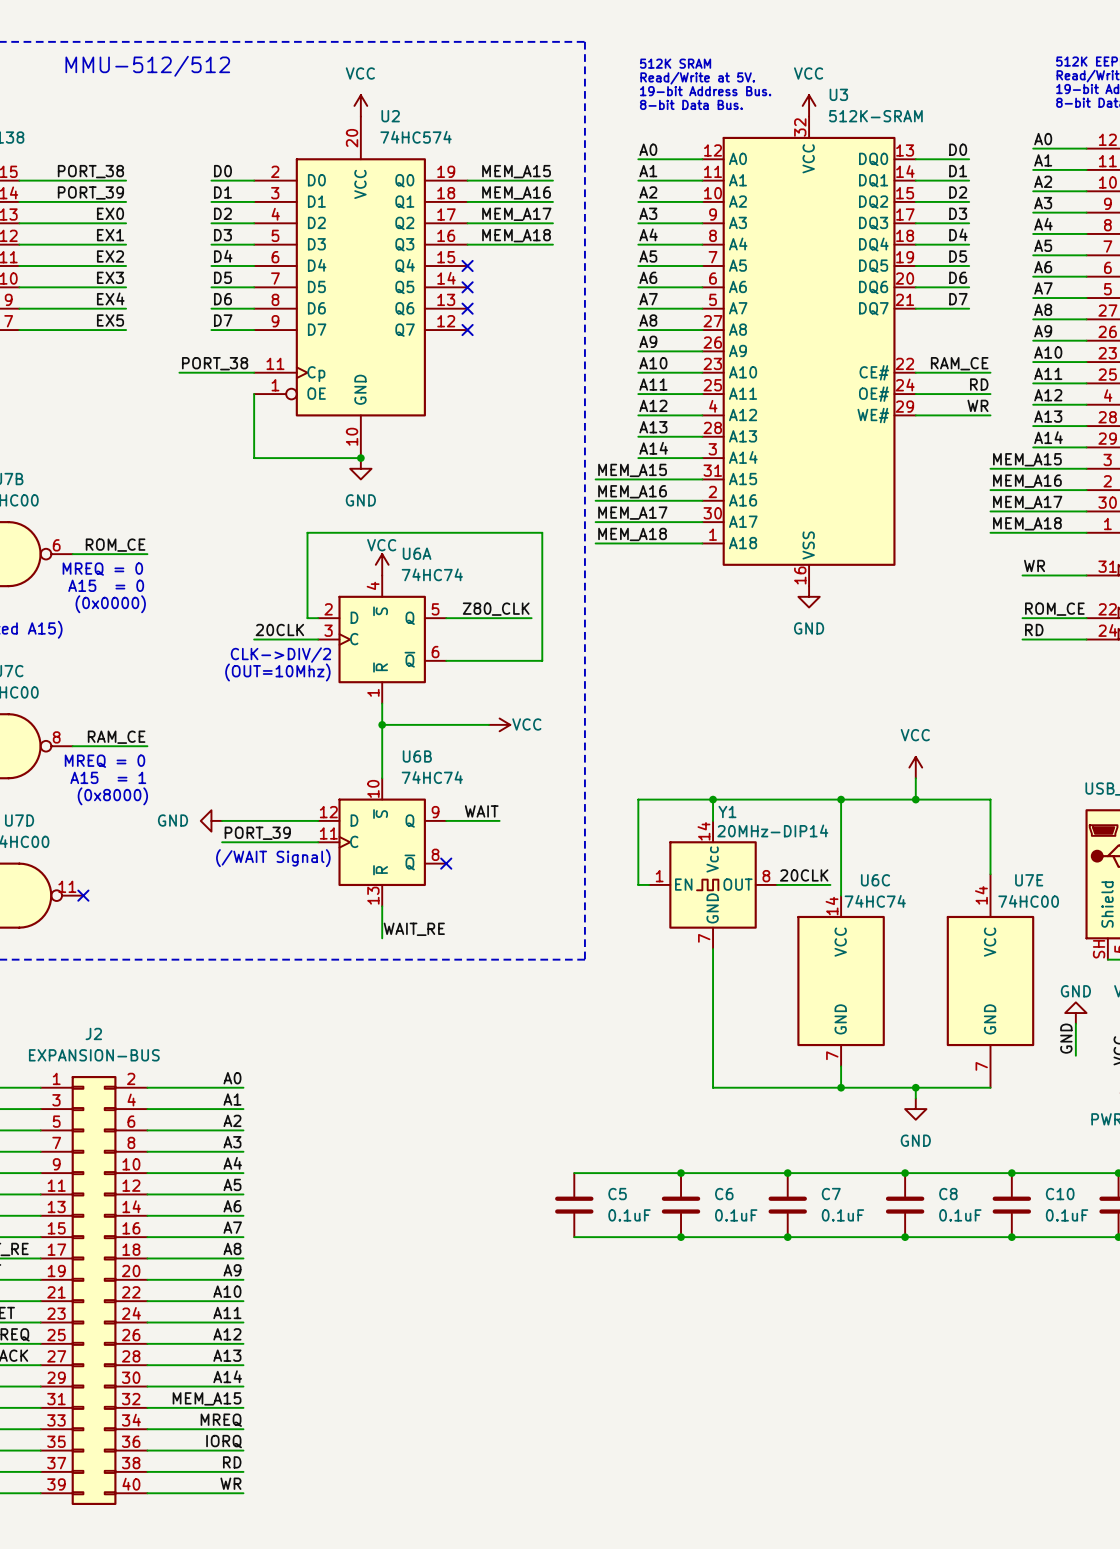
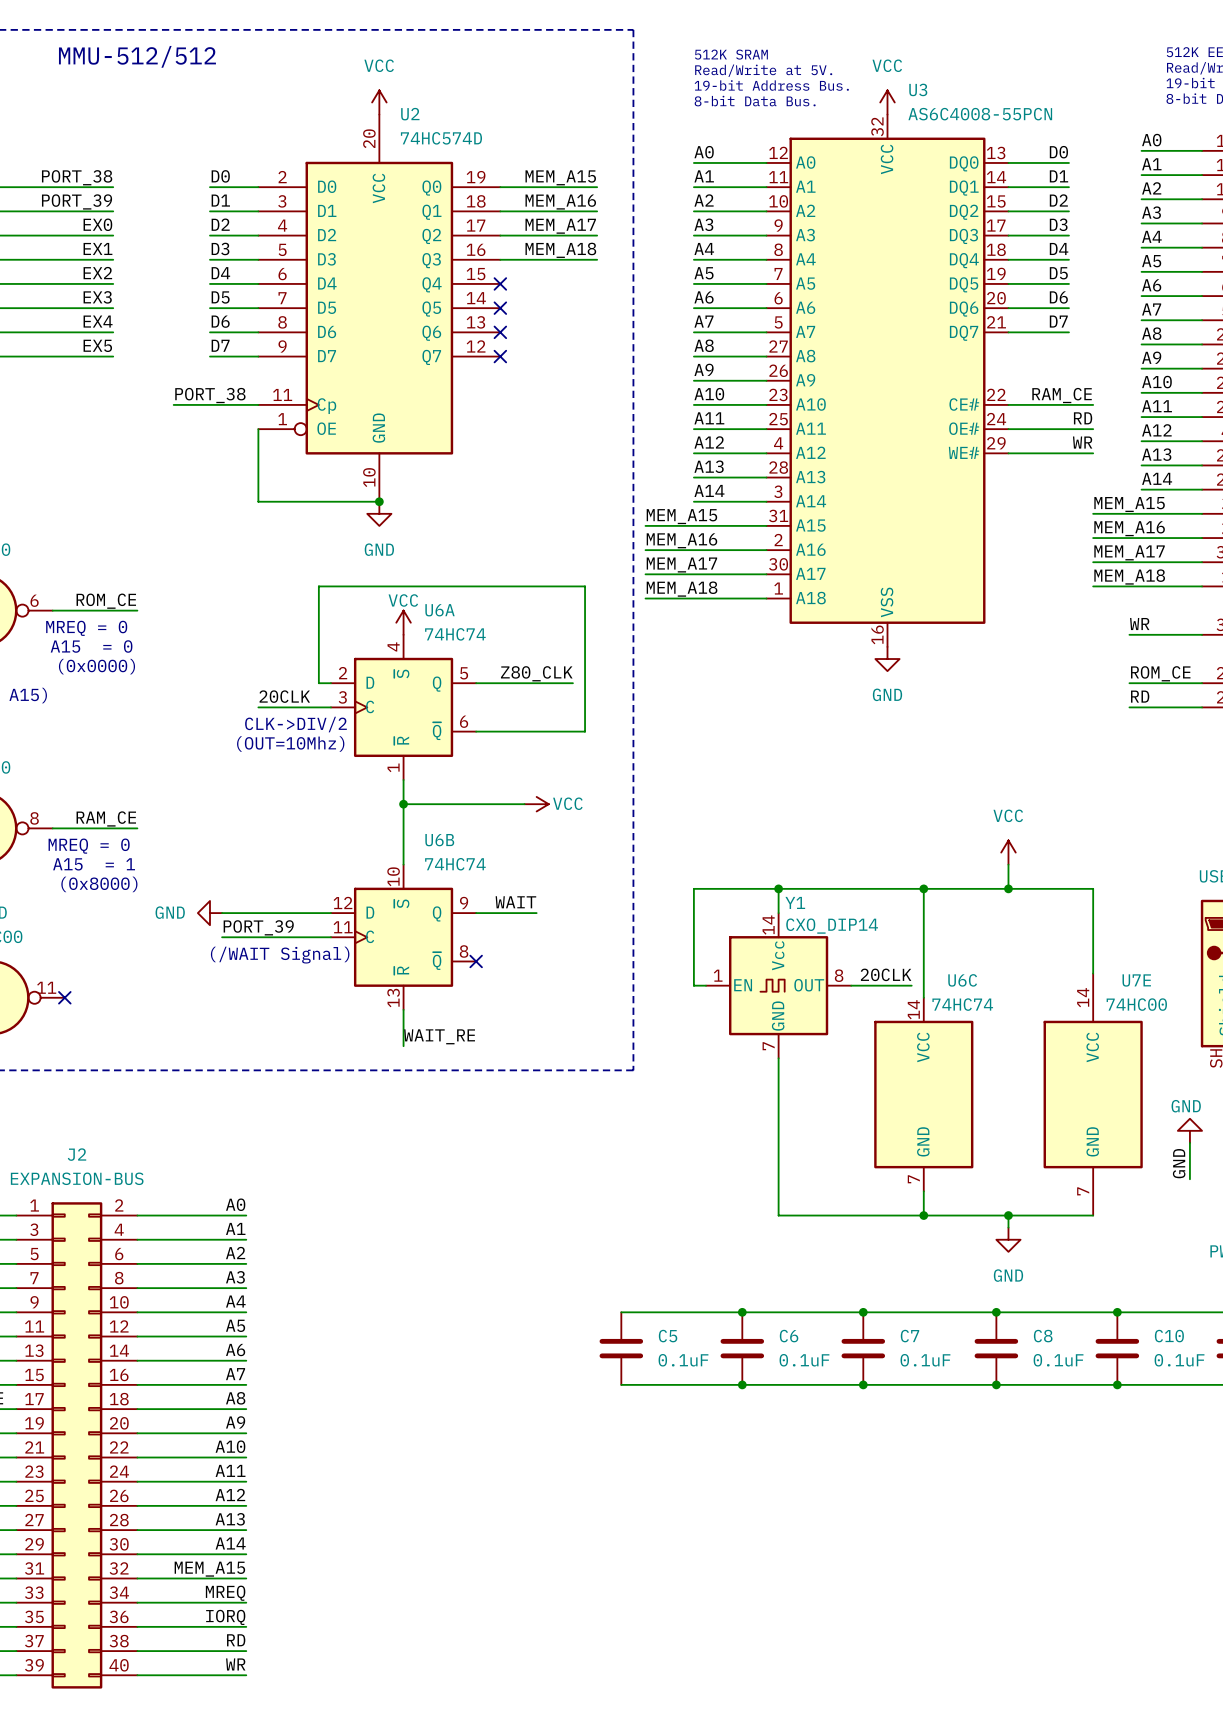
U3 value: 512K-SRAM (875, 116) -> AS6C4008-55PCN (980, 114)
U2 value: 74HC574 (416, 137) -> 74HC574D (441, 138)
Y1 value: 20MHz-DIP14 (772, 830) -> CXO_DIP14 (832, 926)

